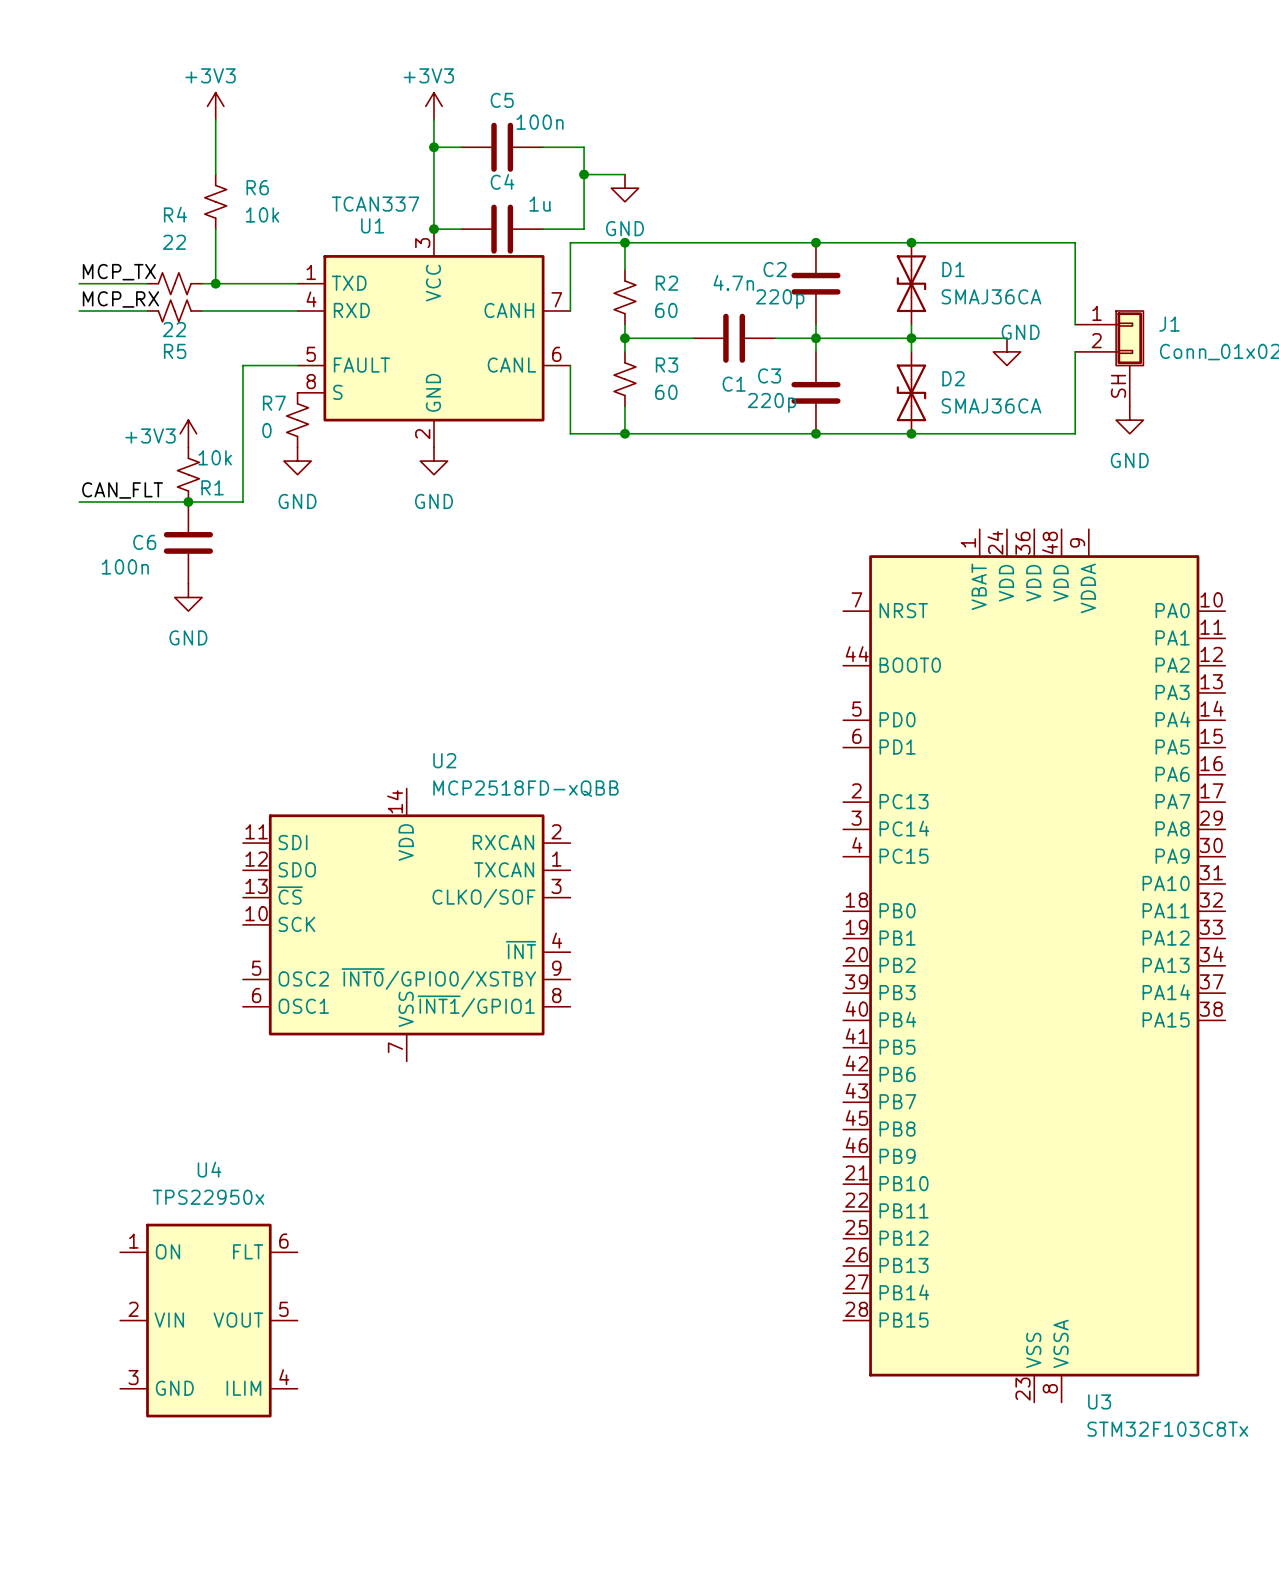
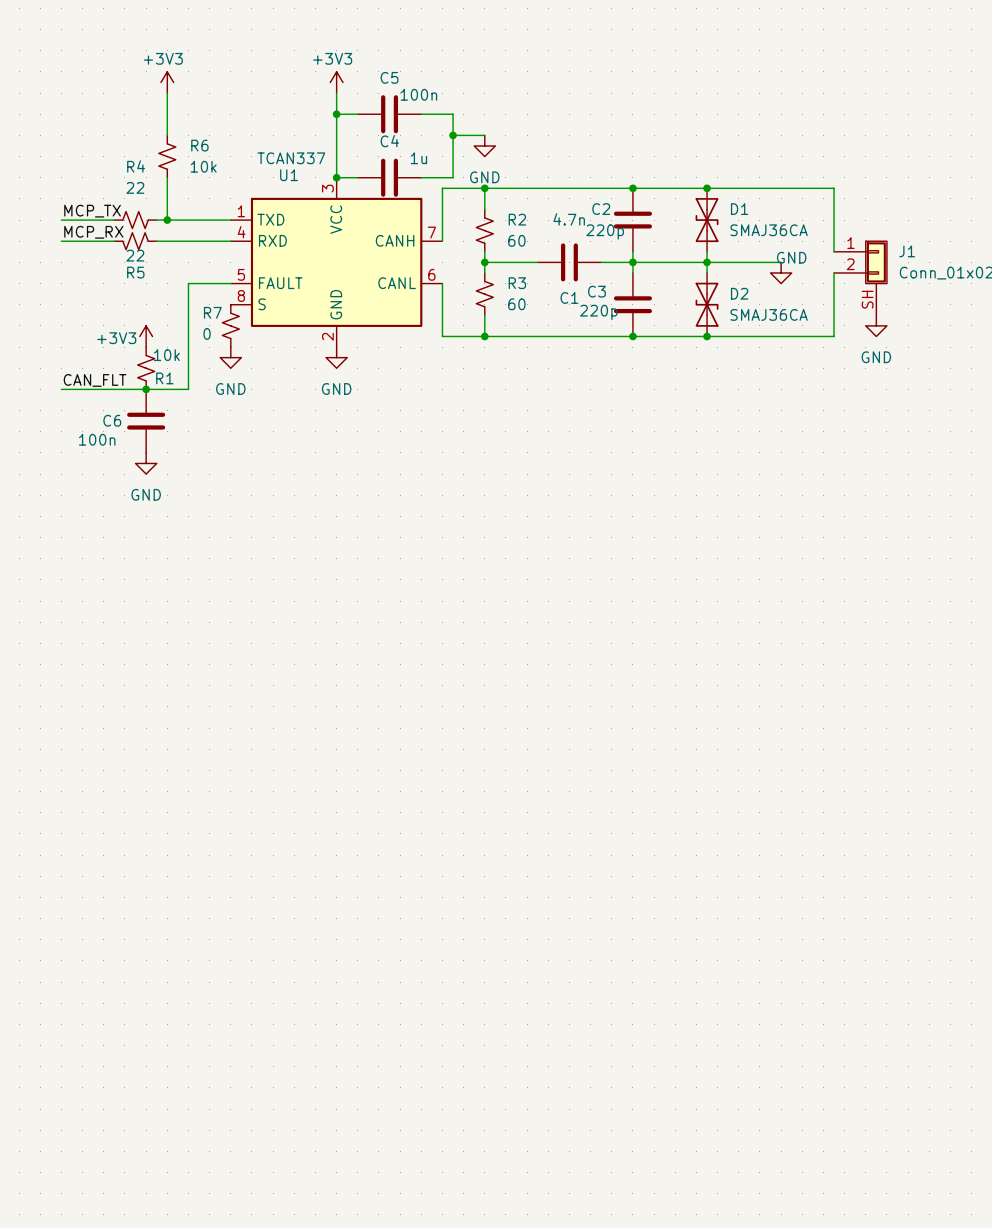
U2: MCP2518FD-xQBB (406, 924) -> none
U3: STM32F103C8Tx (1034, 965) -> none
U4: TPS22950x (208, 1320) -> none

